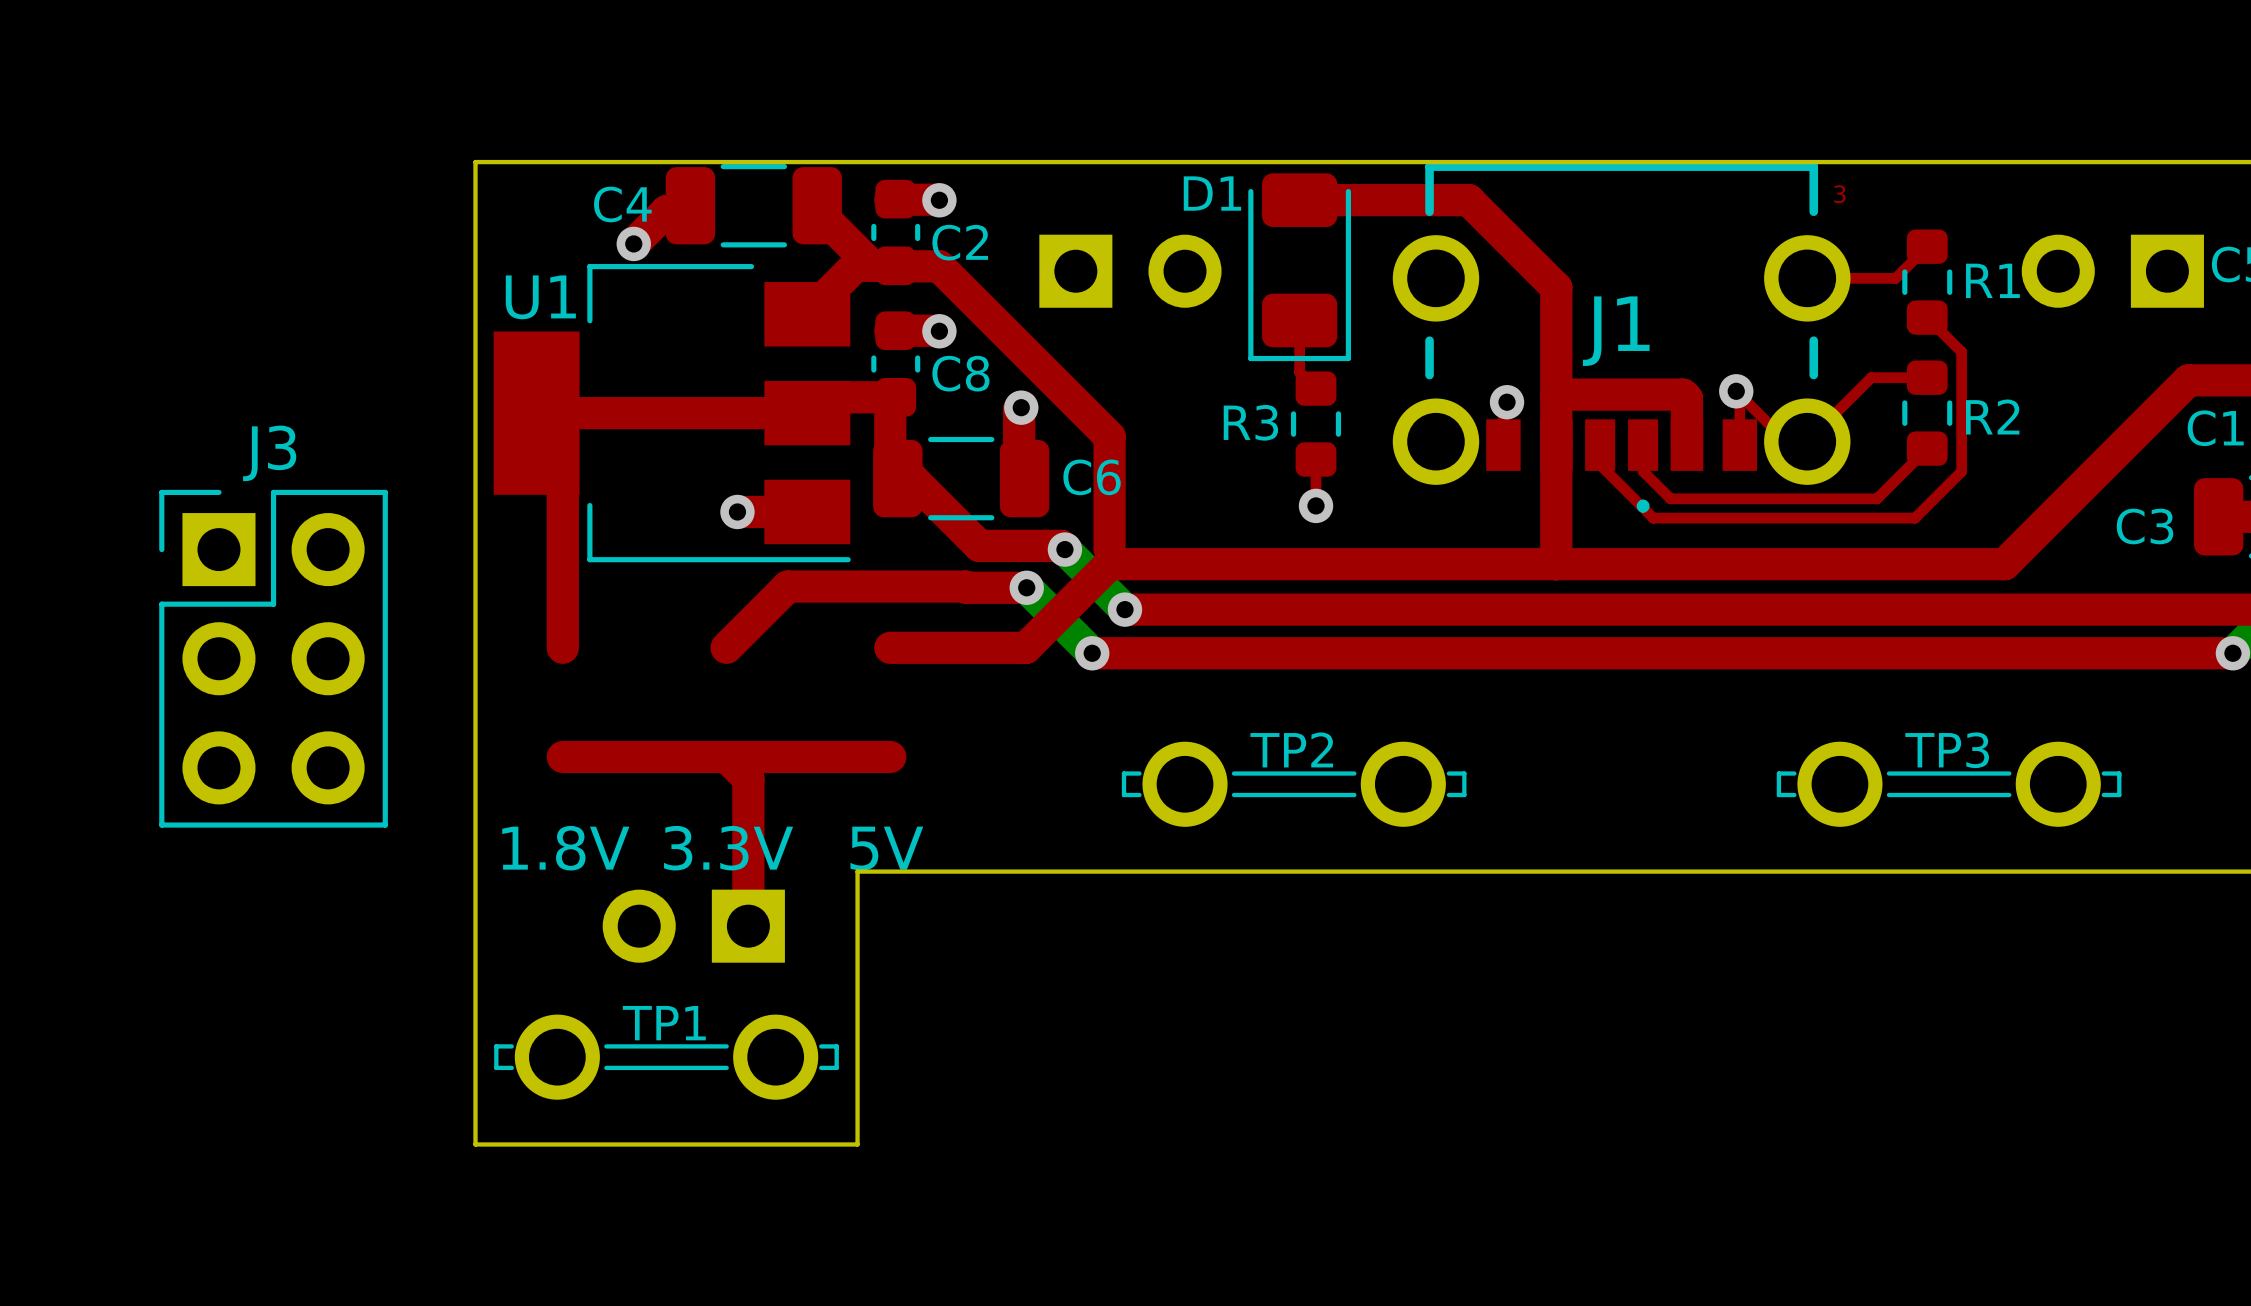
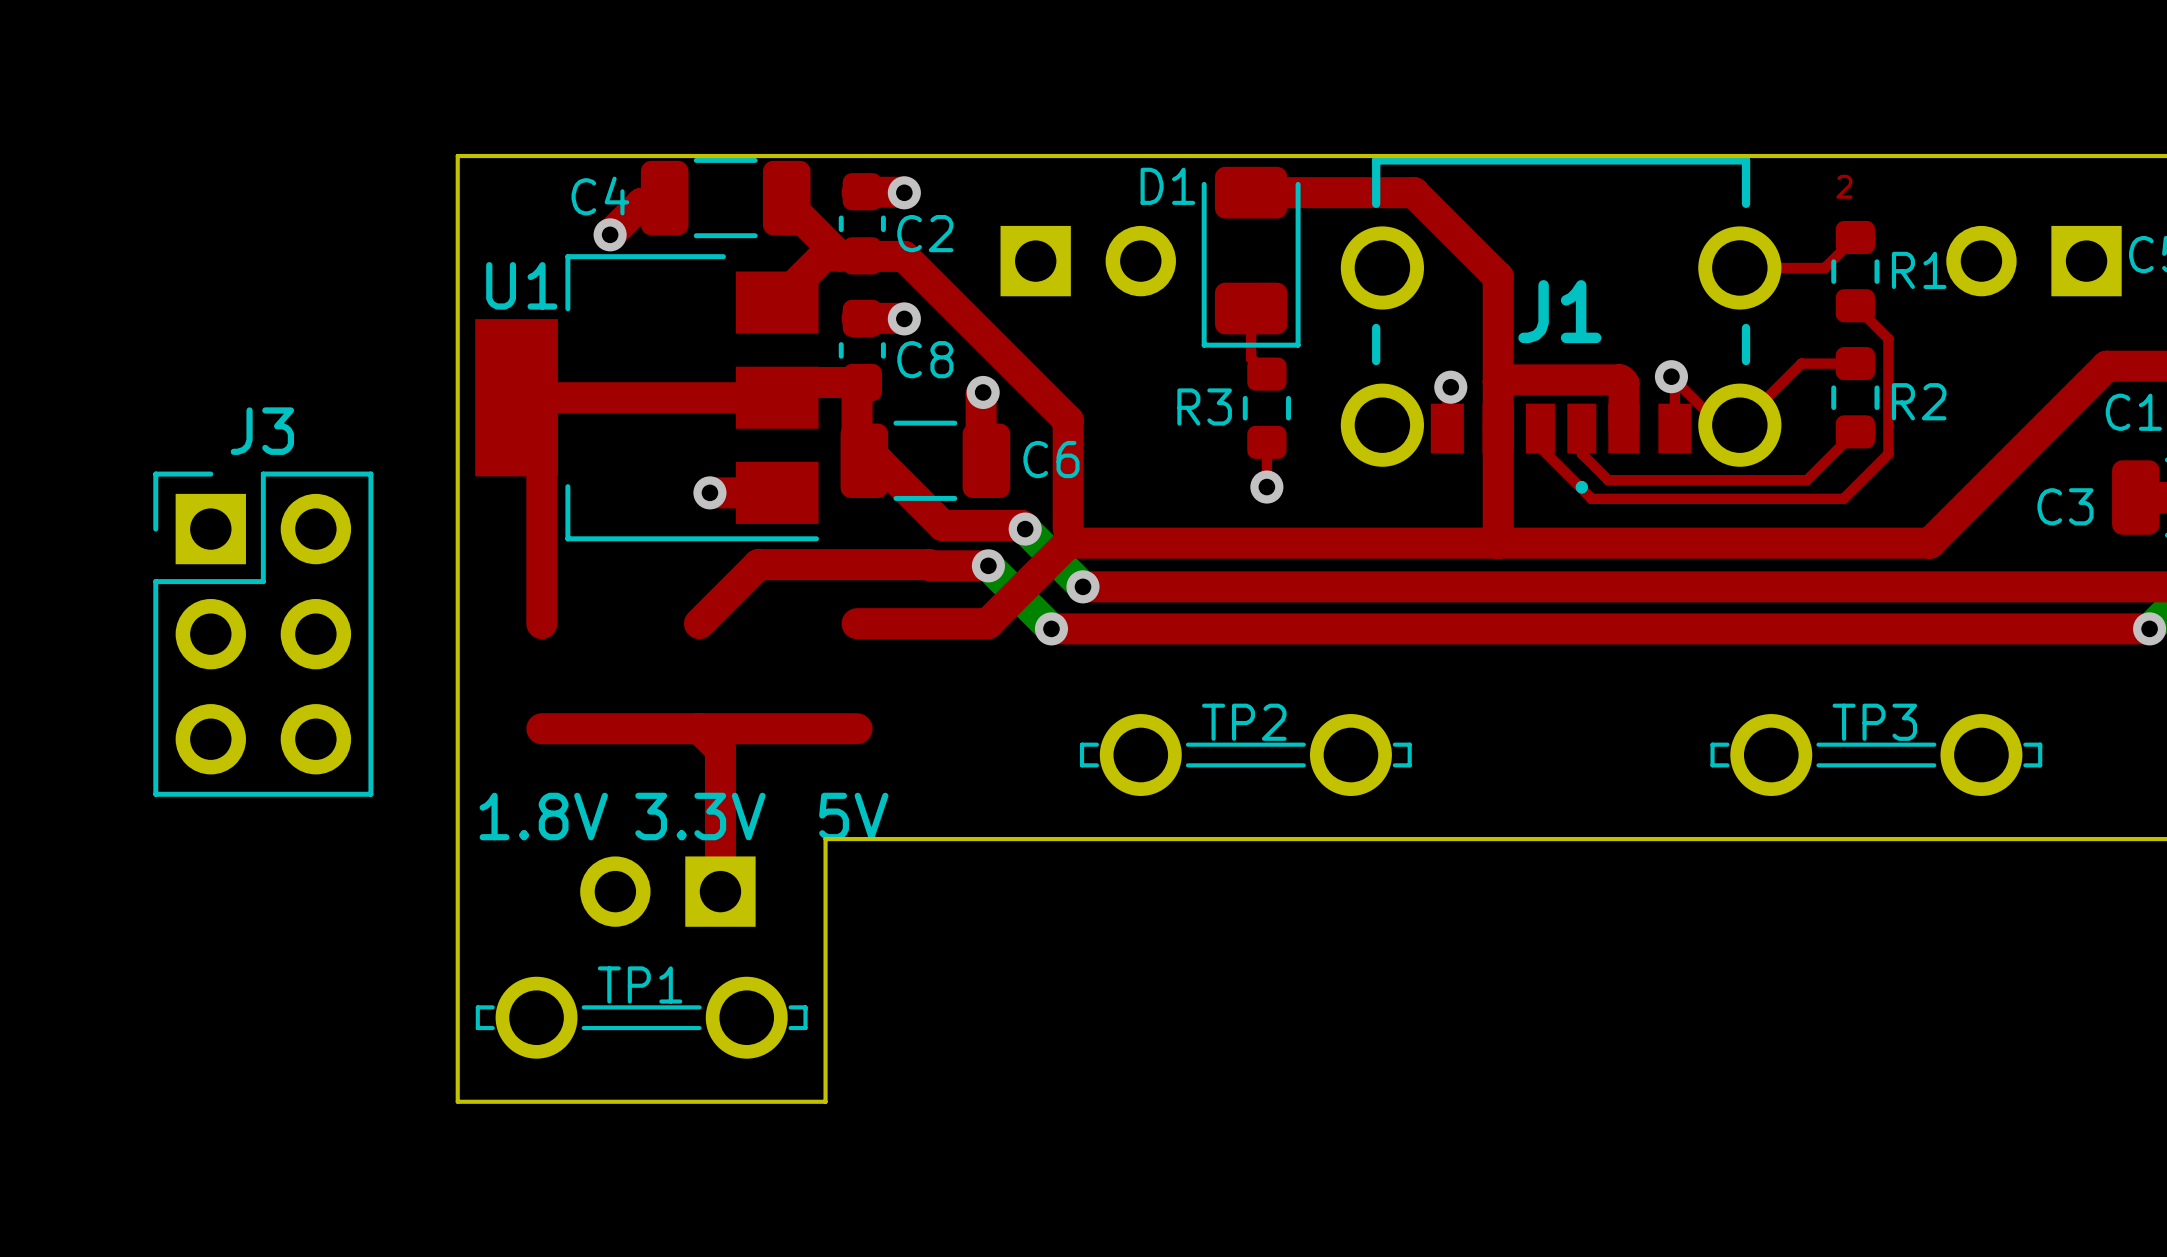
text: none -> 2 (1844, 186)
text: 3 (1839, 194) -> none

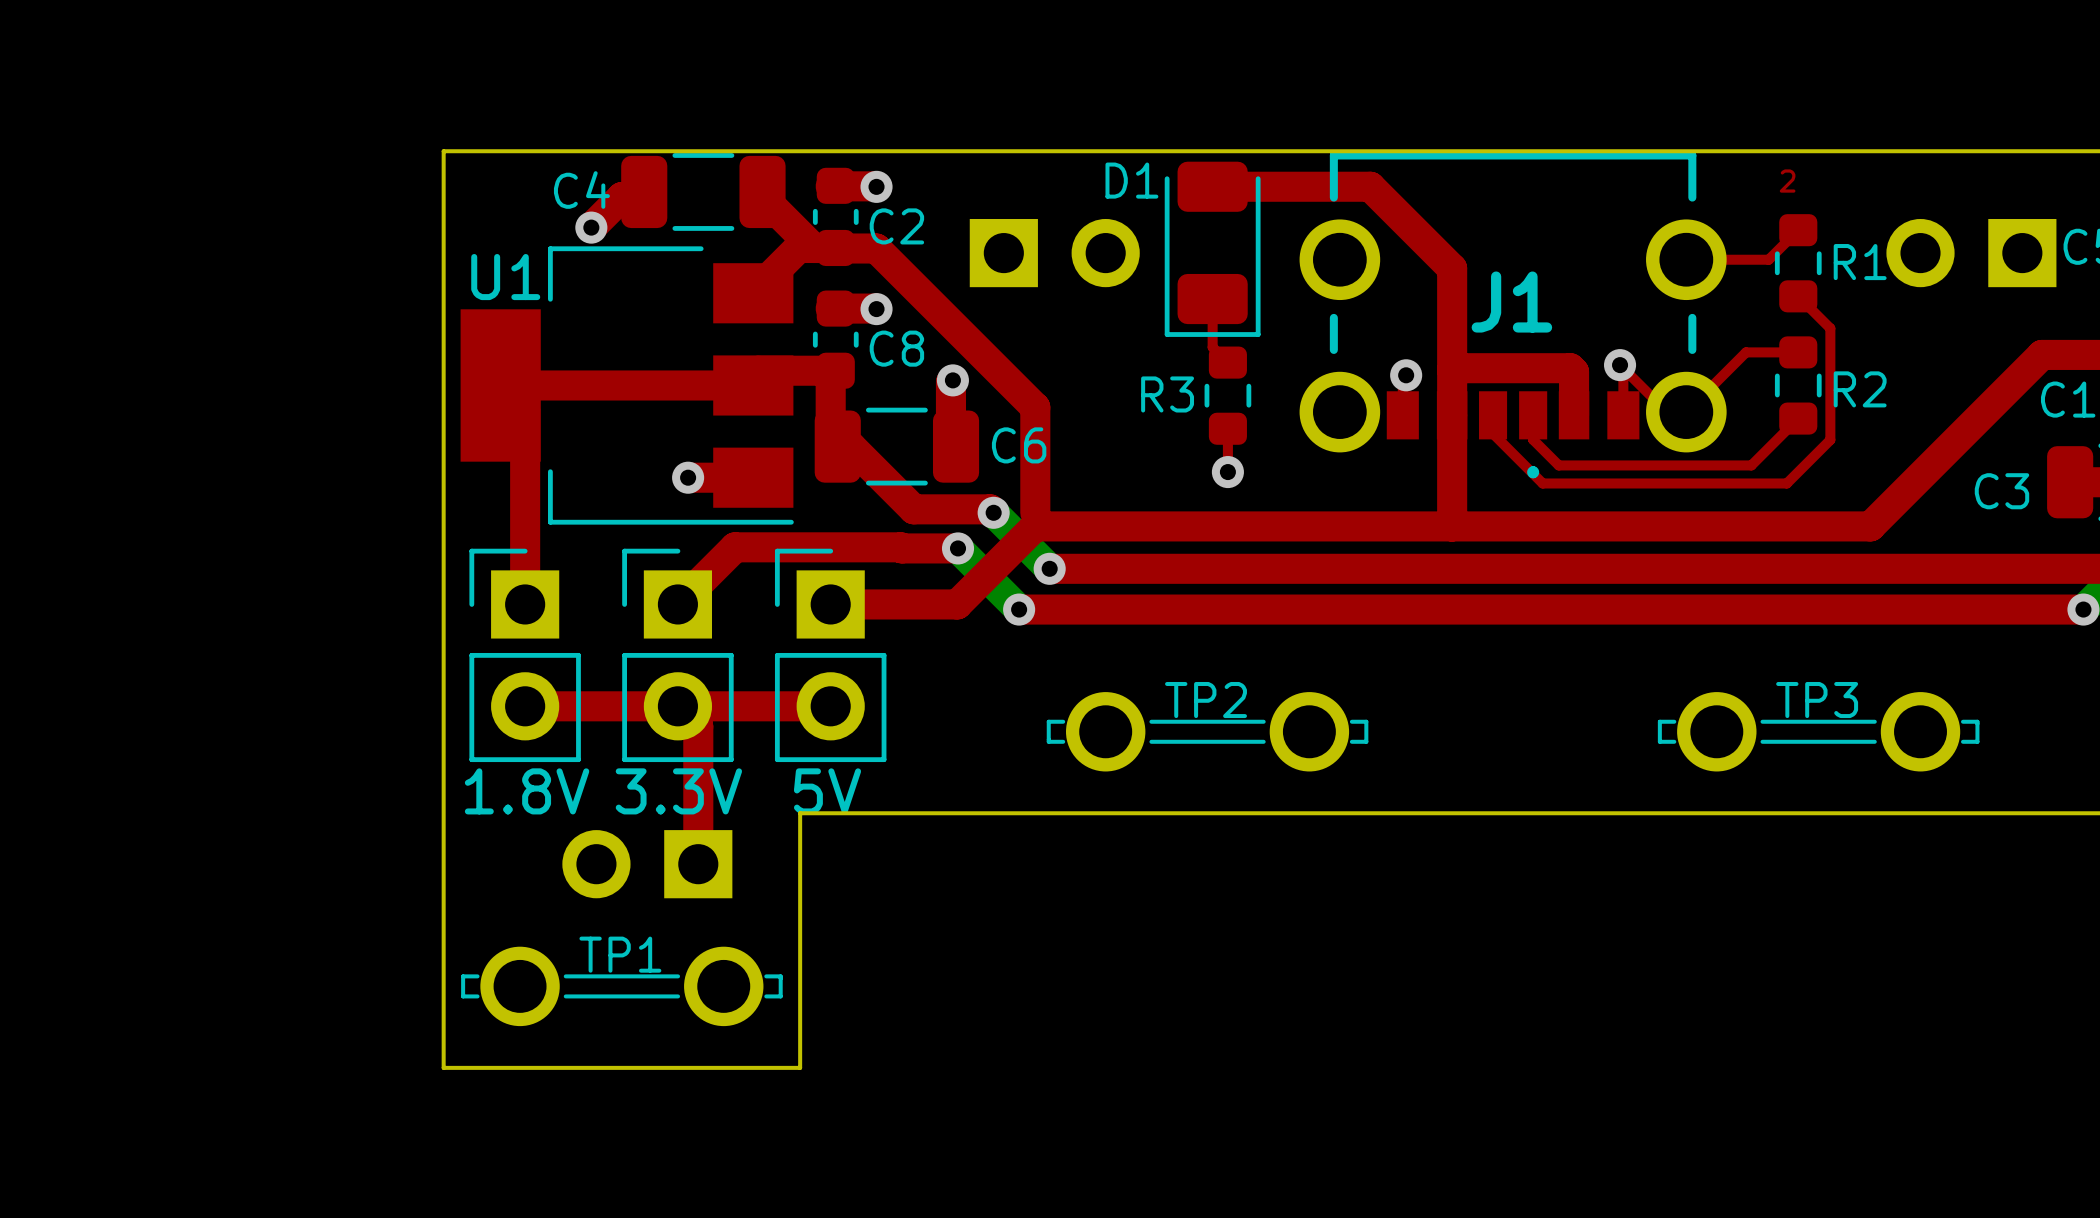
J3: (263, 634) -> none
part: none -> (525, 655)
part: none -> (677, 655)
part: none -> (830, 655)

